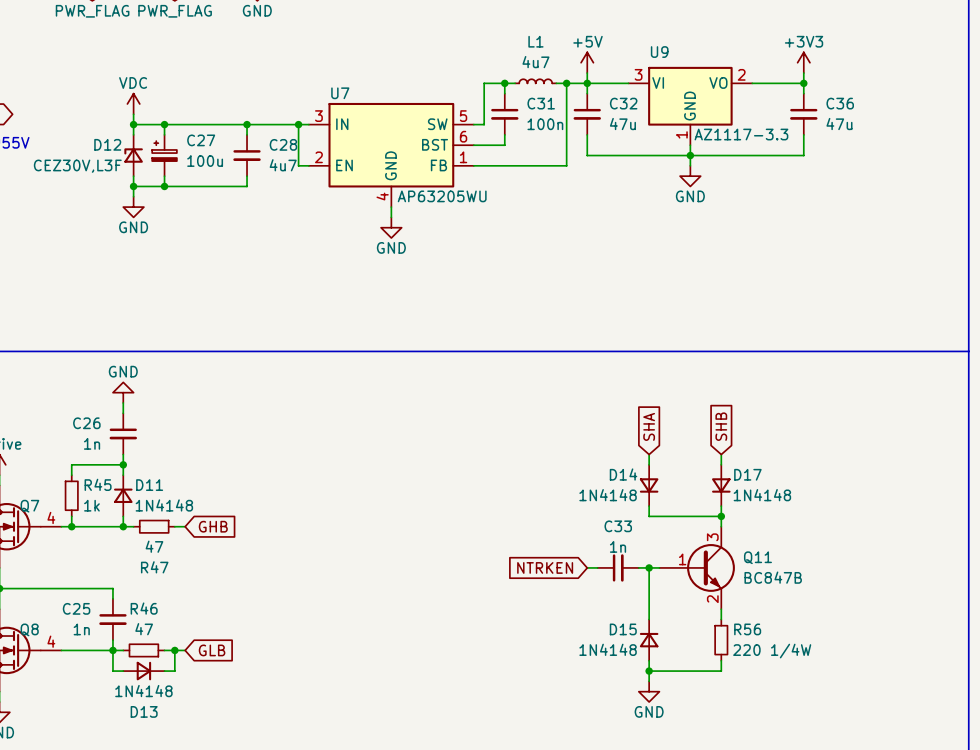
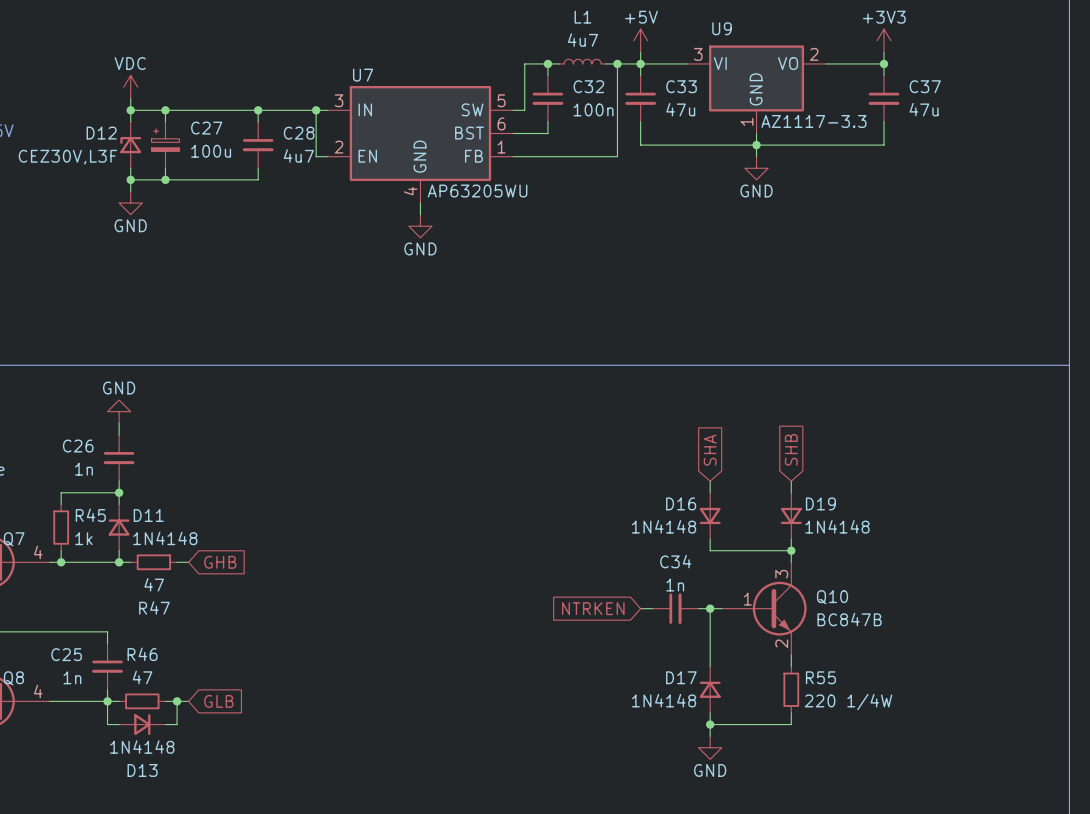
C31 name: C31 (541, 103) -> C32 (588, 86)
C32 name: C32 (623, 103) -> C33 (681, 86)
C36 name: C36 (840, 103) -> C37 (925, 86)
D14 name: D14 (623, 474) -> D16 (681, 503)
D17 name: D17 (747, 474) -> D19 (820, 503)
C33 name: C33 (618, 526) -> C34 (675, 561)
Q11 name: Q11 (757, 557) -> Q10 (832, 597)
D15 name: D15 (623, 629) -> D17 (681, 677)
R56 name: R56 (747, 629) -> R55 (820, 677)

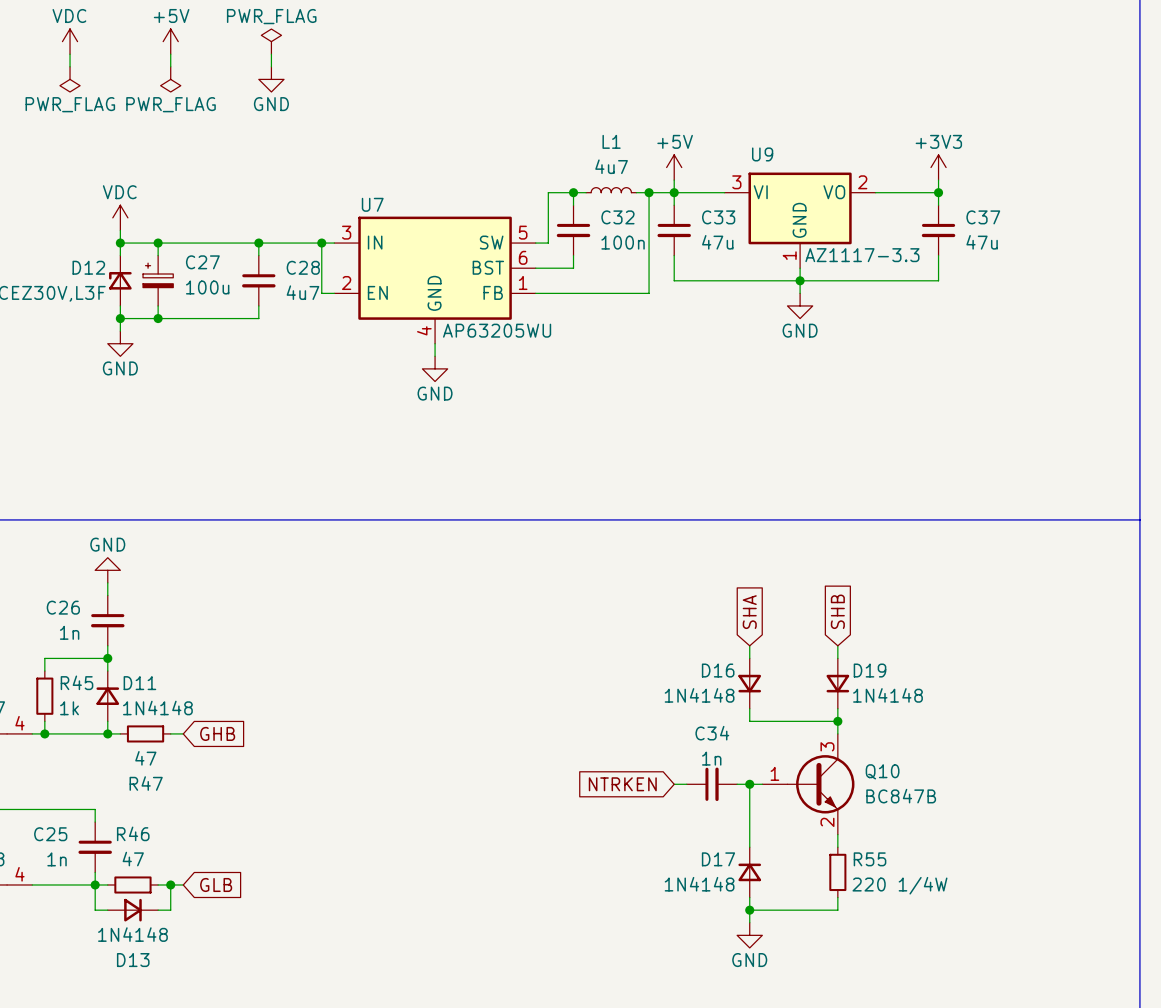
Q10 symbol: [721, 562, 807, 656] -> [762, 733, 855, 835]

